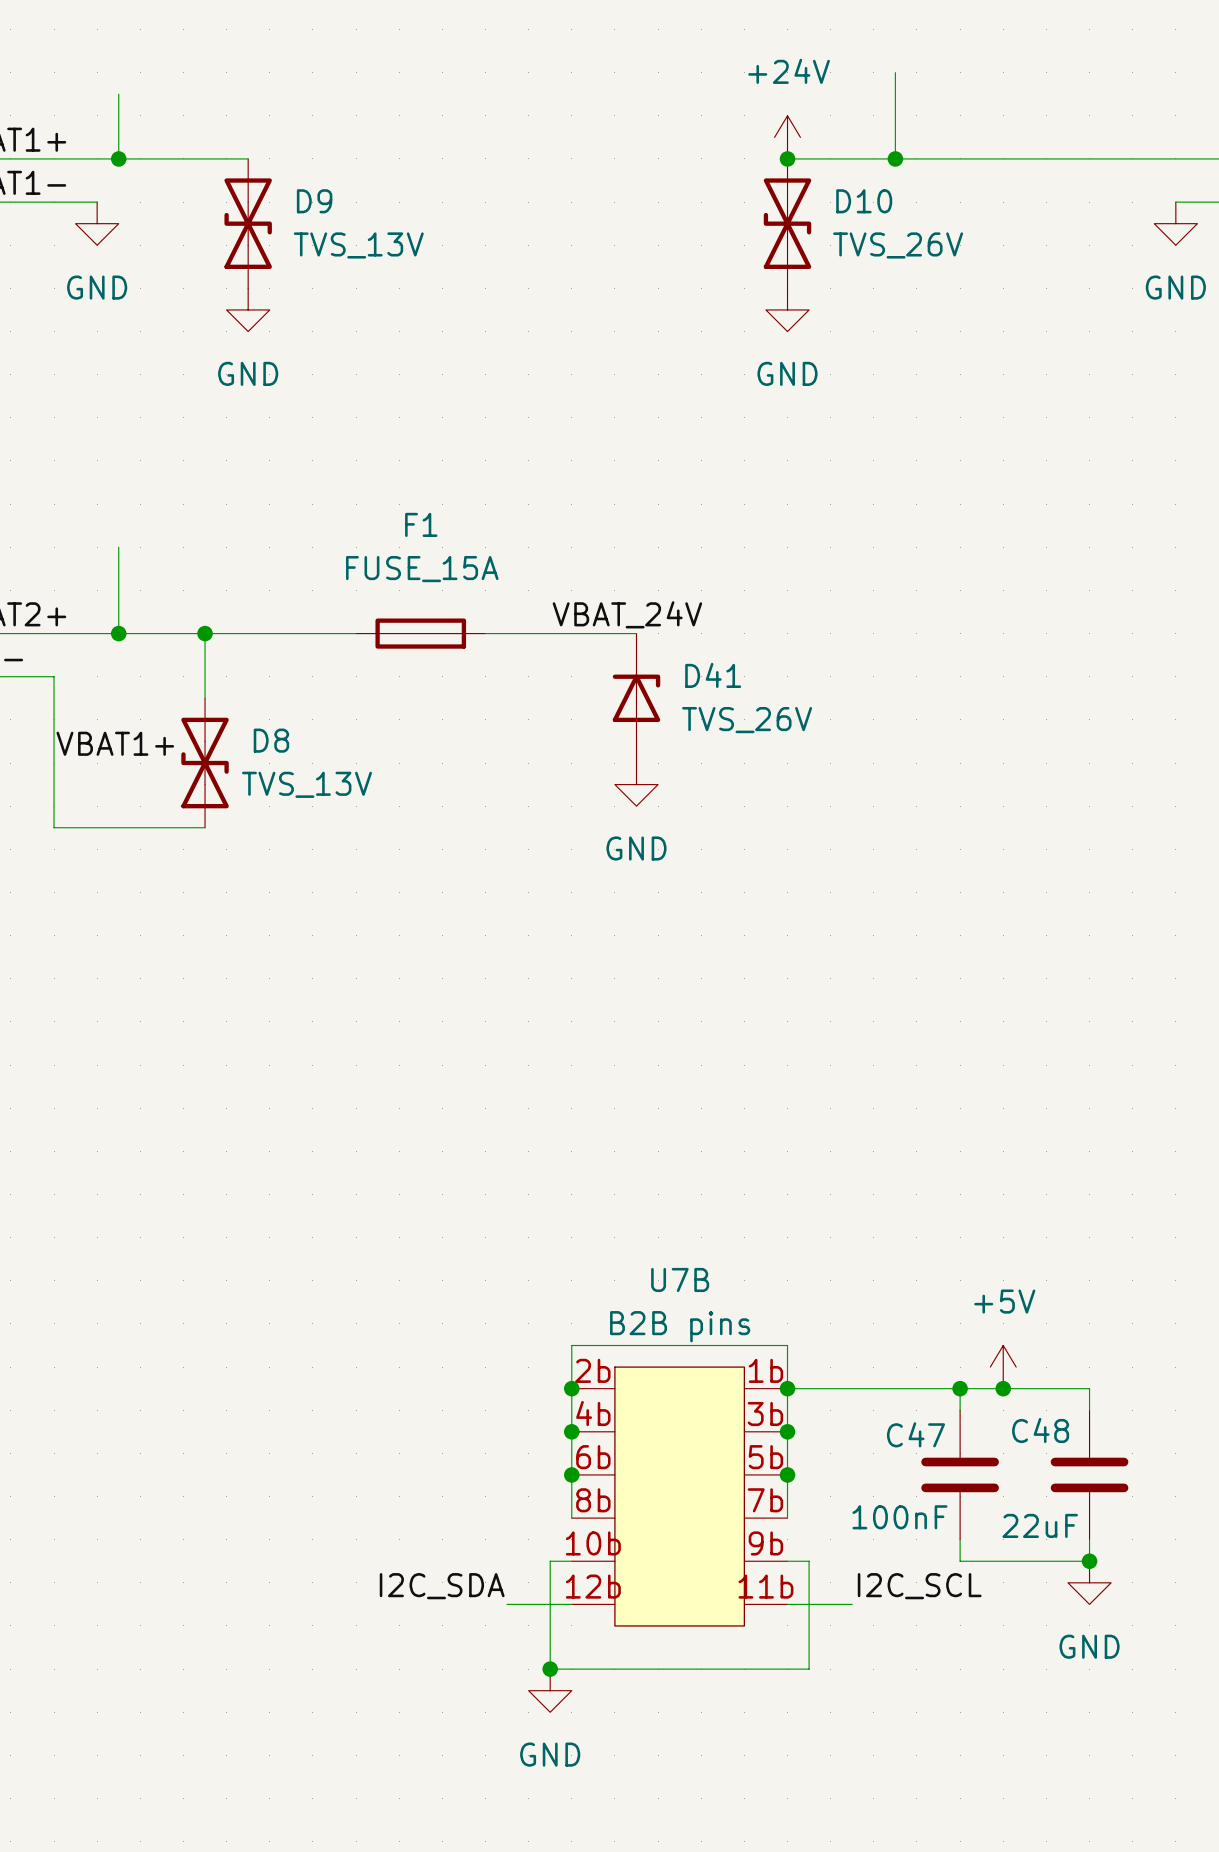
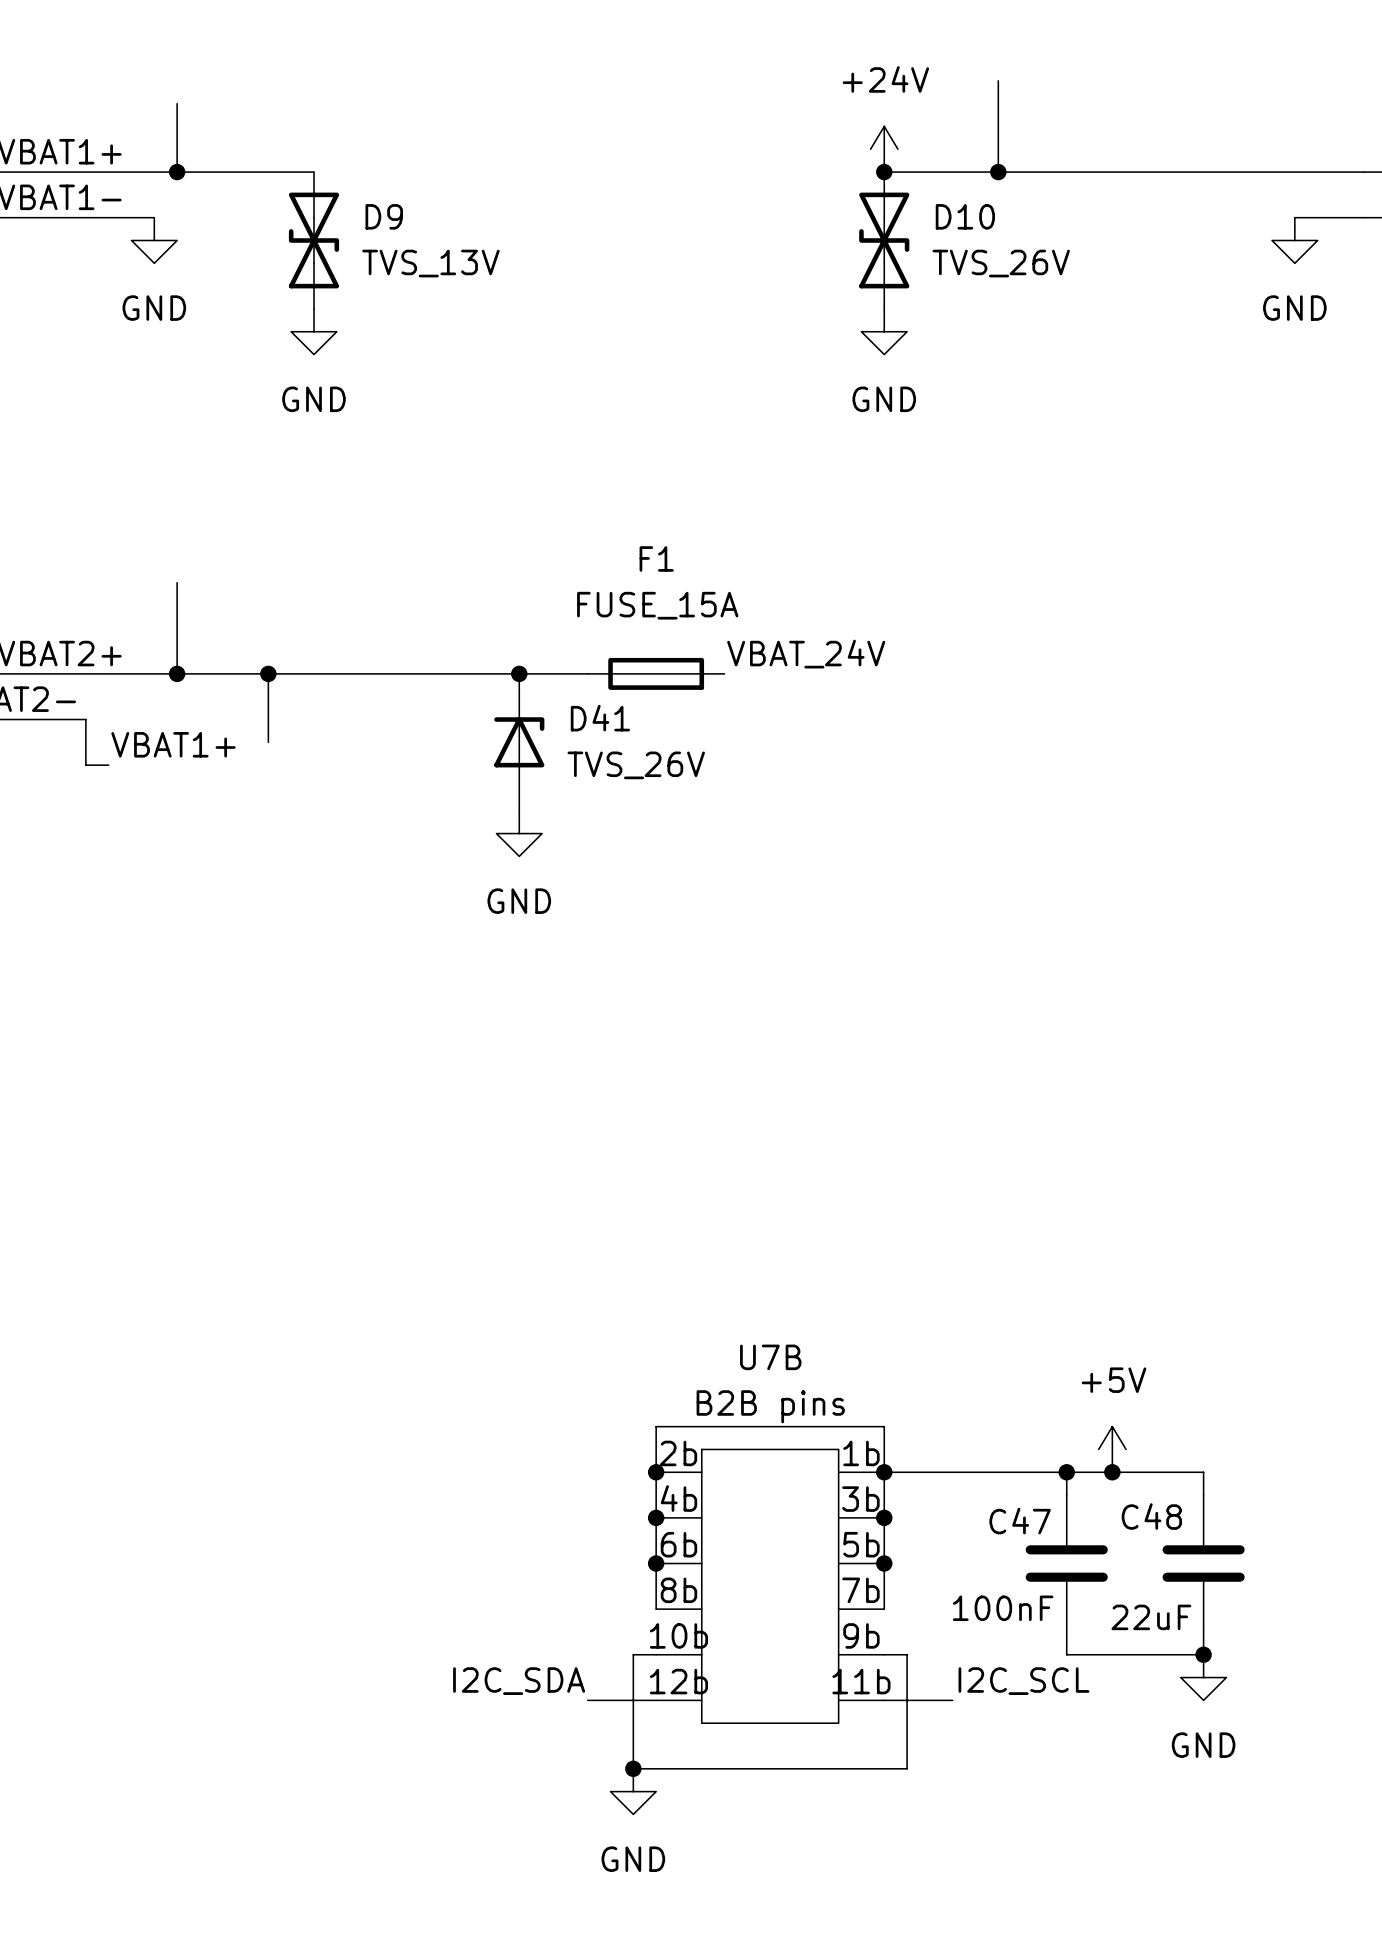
label position: VBAT_24V (627, 614) -> VBAT_24V (806, 654)
F1 position: (420, 633) -> (656, 673)
junction: none -> (519, 673)
wire: (32, 676) (54, 676) (54, 827) (205, 827) -> (85, 719) (85, 765) (108, 765)
D41 position: (636, 698) -> (519, 742)
label position: VBAT1+ (115, 743) -> VBAT1+ (173, 744)
D8: TVS_13V (205, 763) -> none
power symbol position: GND (636, 784) -> GND (519, 833)

